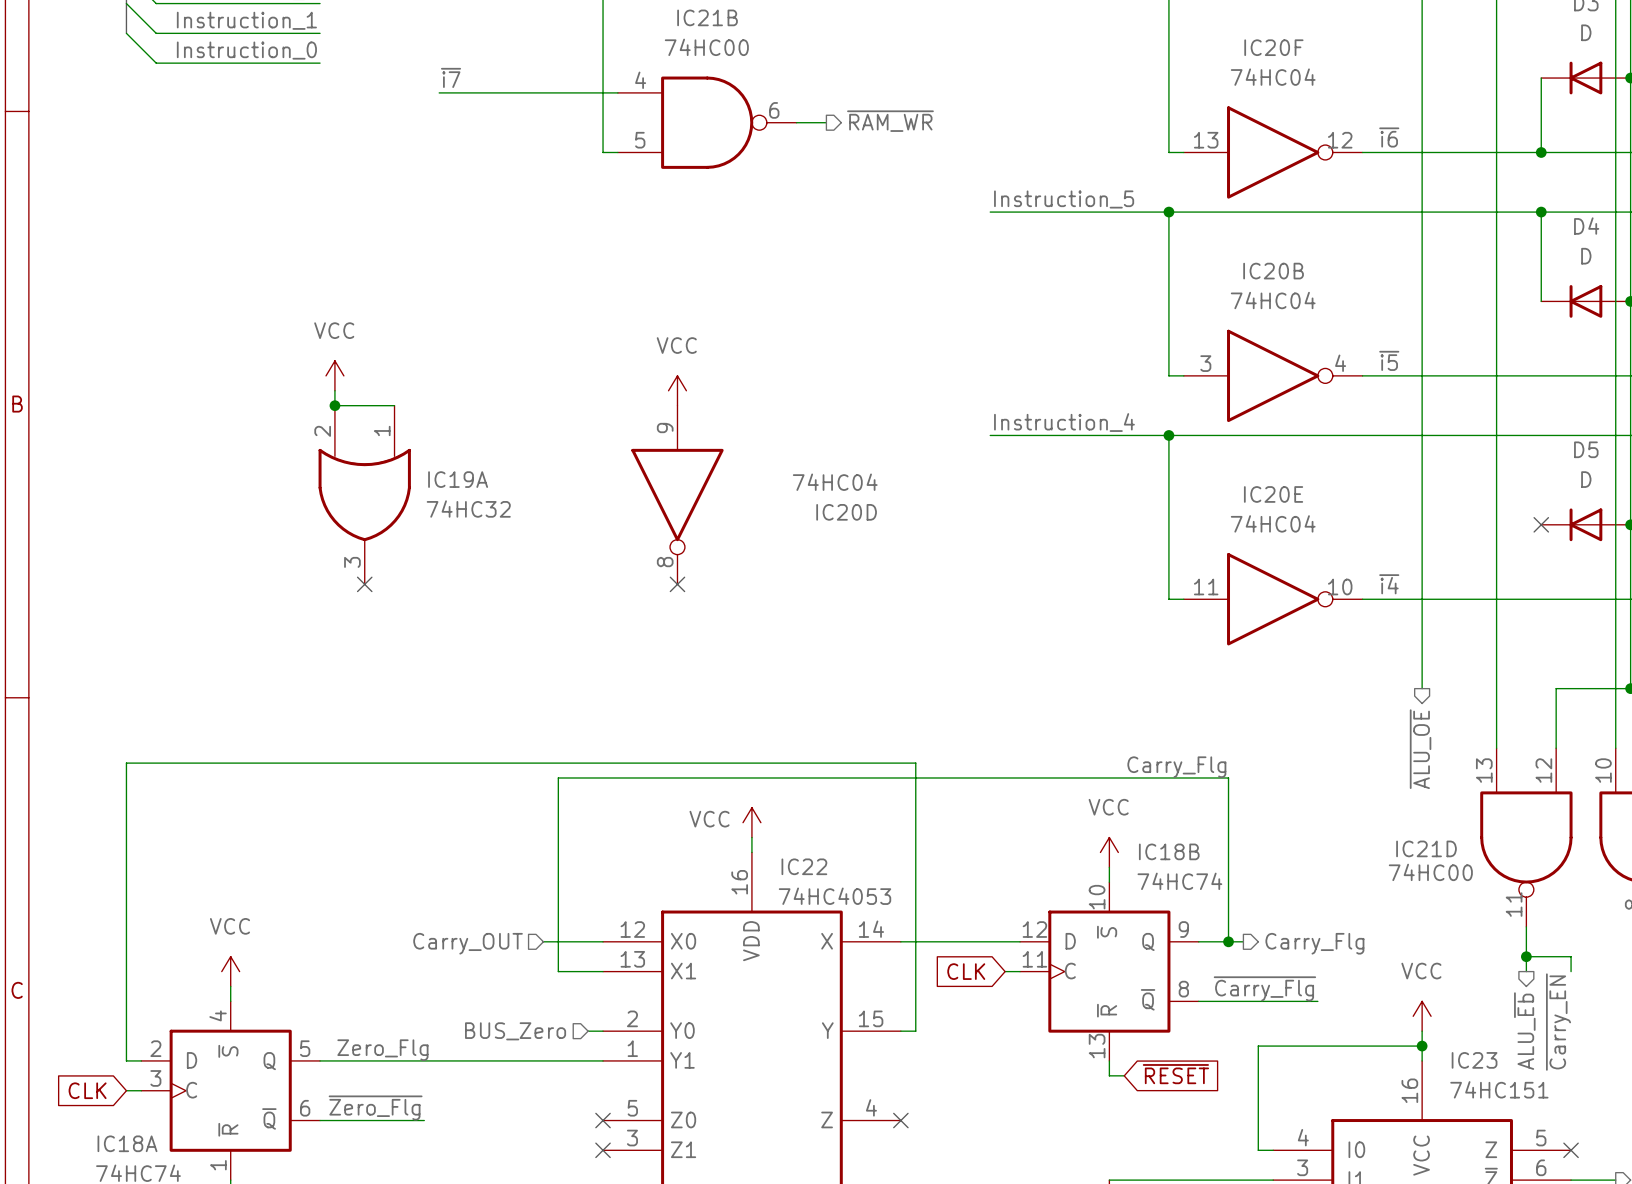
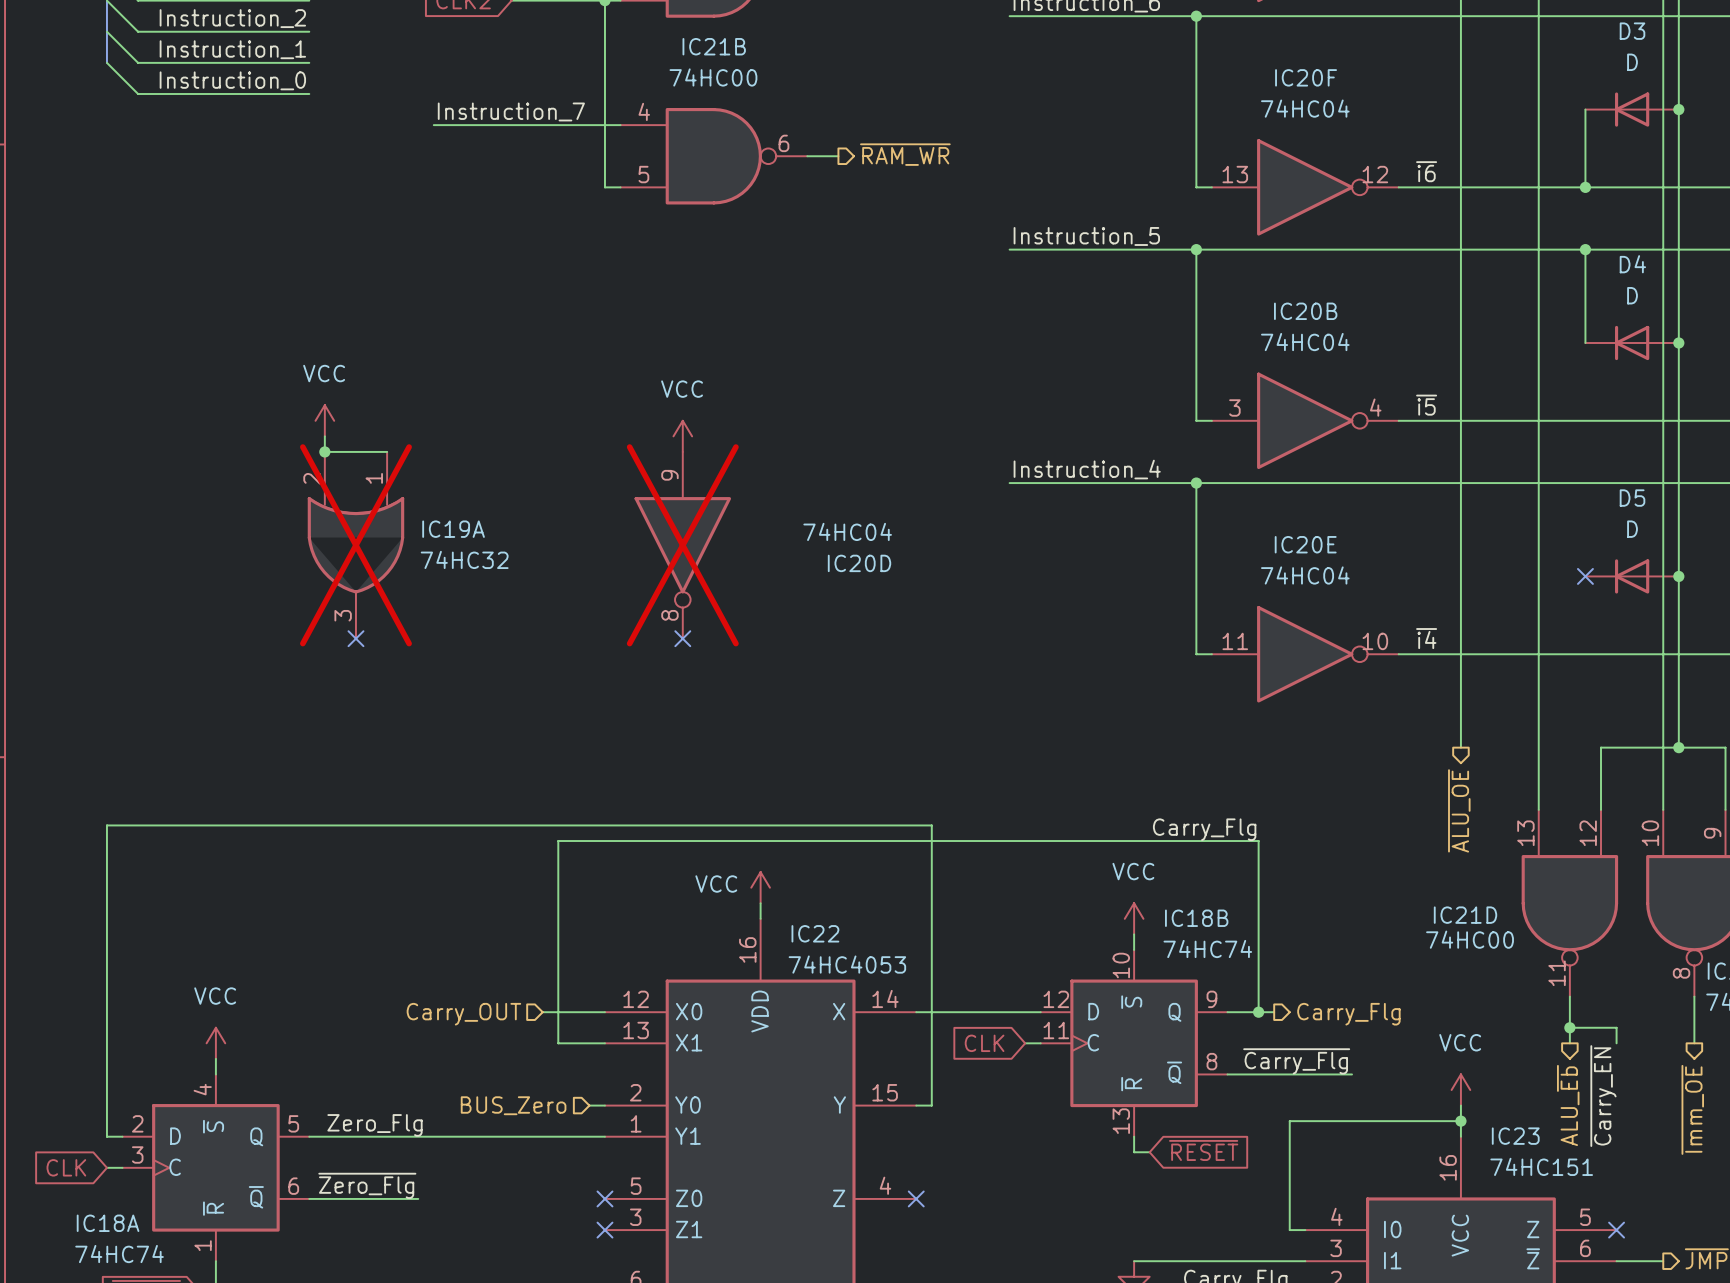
label: ~{i7} (451, 77) -> Instruction_7 (511, 111)
IC19A do-not-place cross: none -> (355, 545)
IC20D do-not-place cross: none -> (682, 545)

